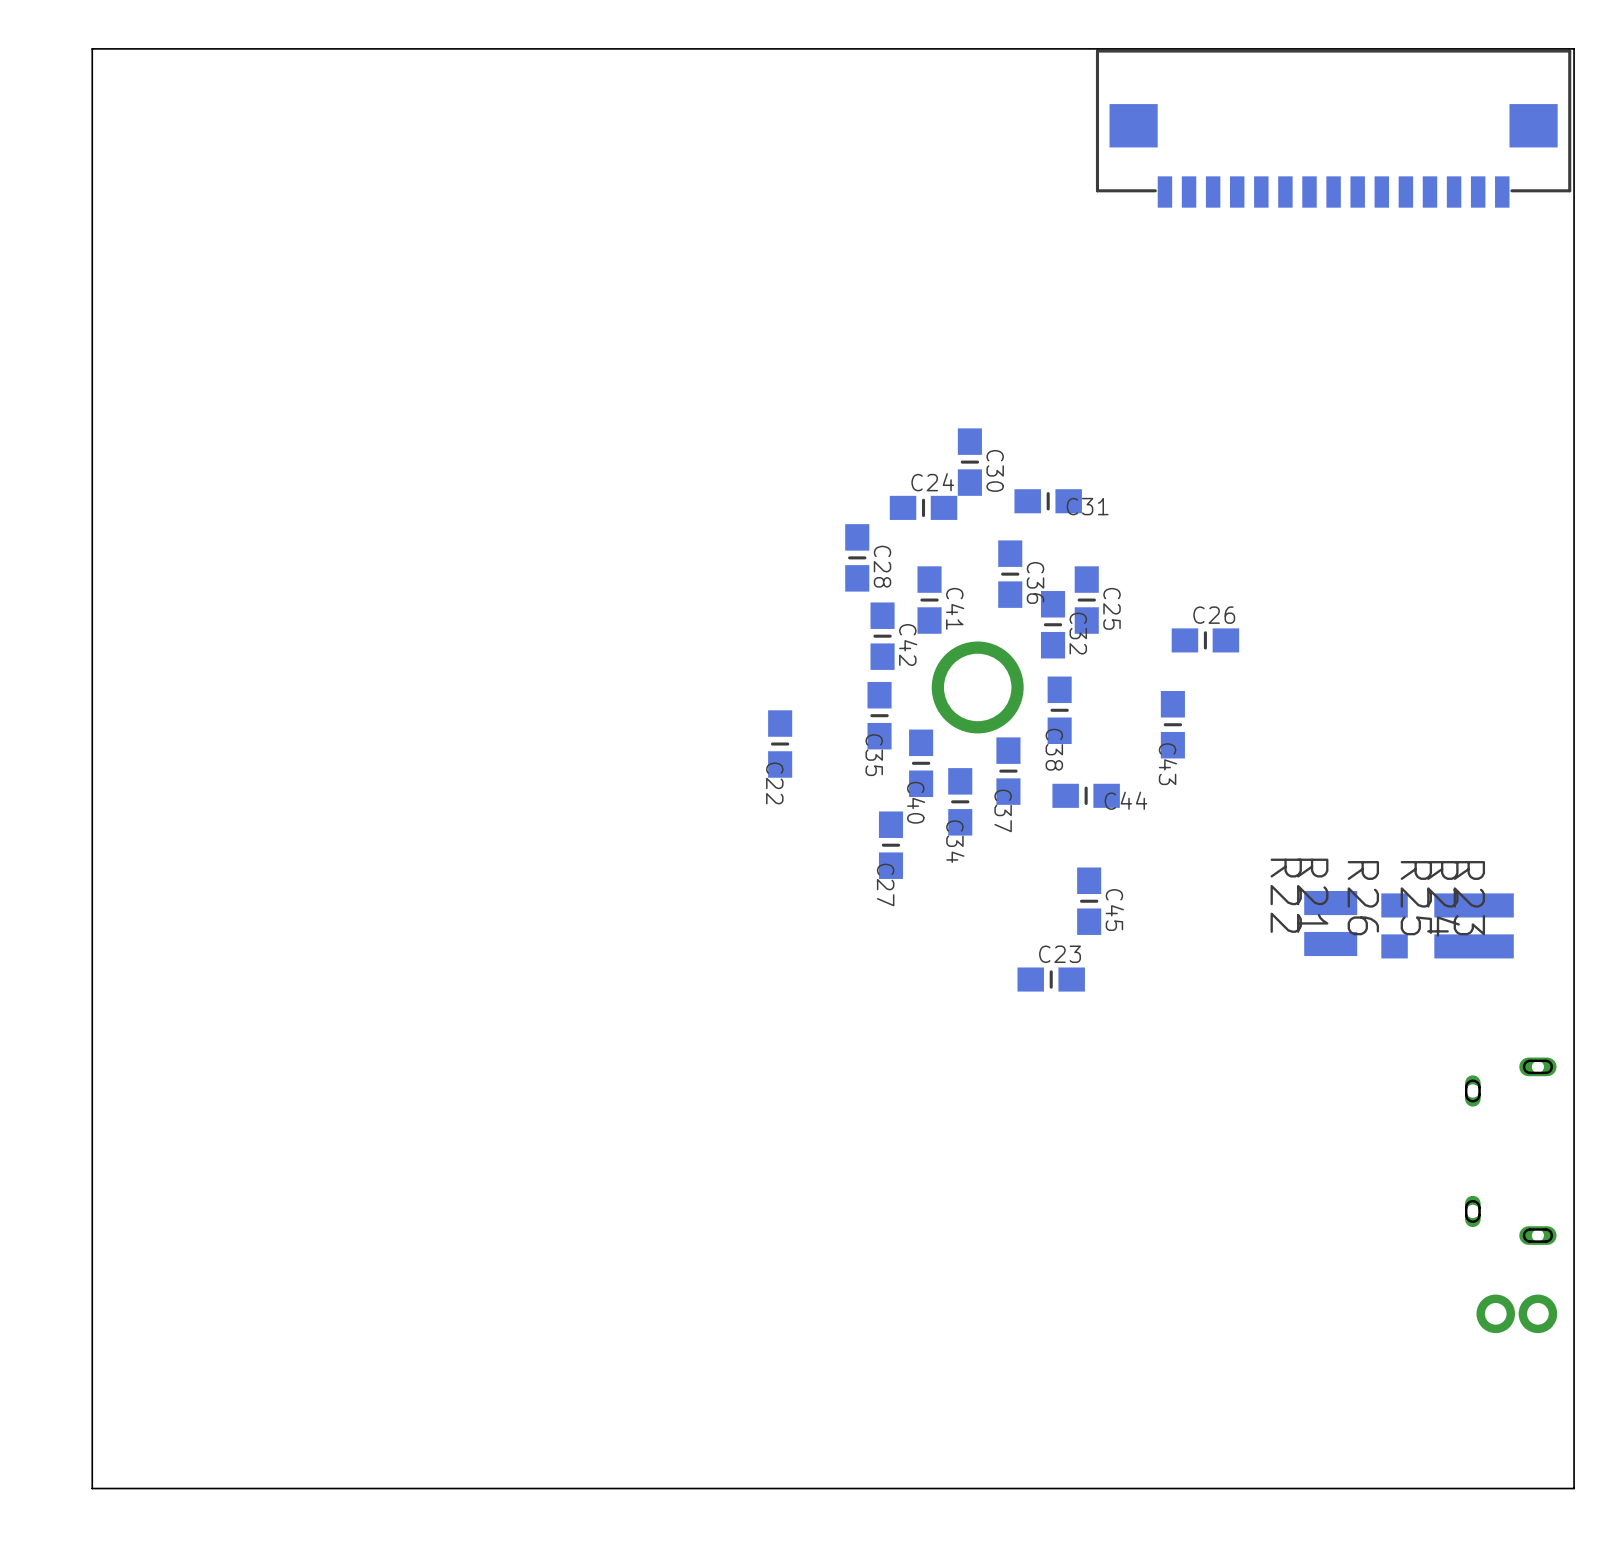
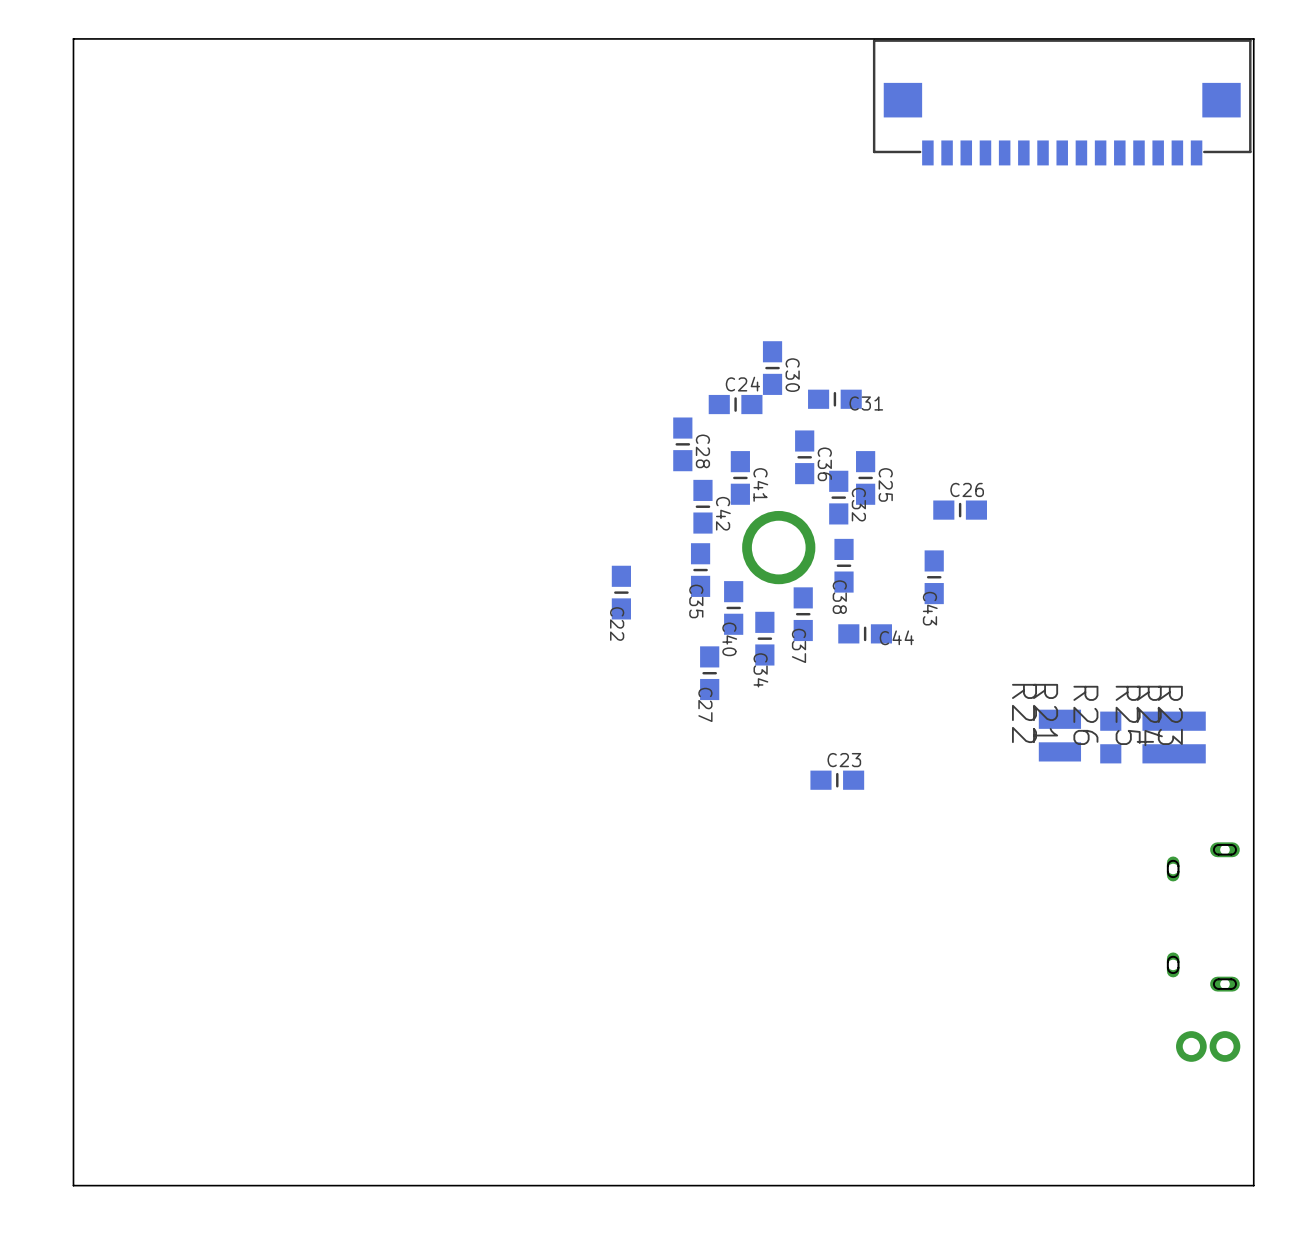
C45: (1089, 901) -> none

